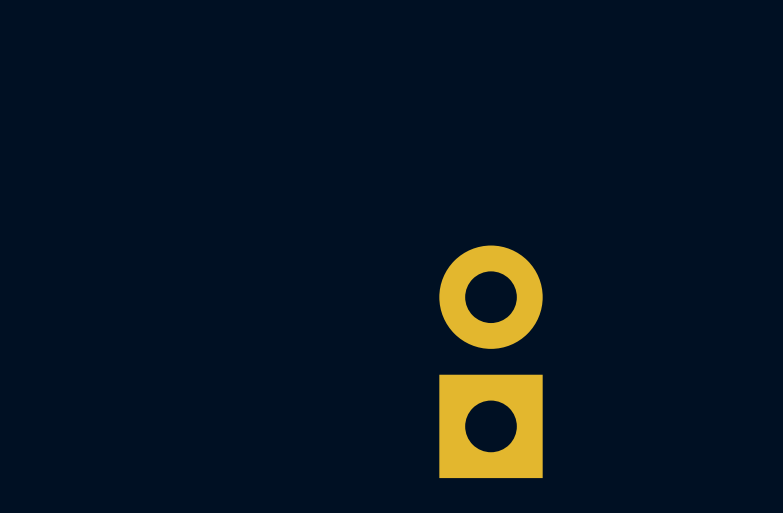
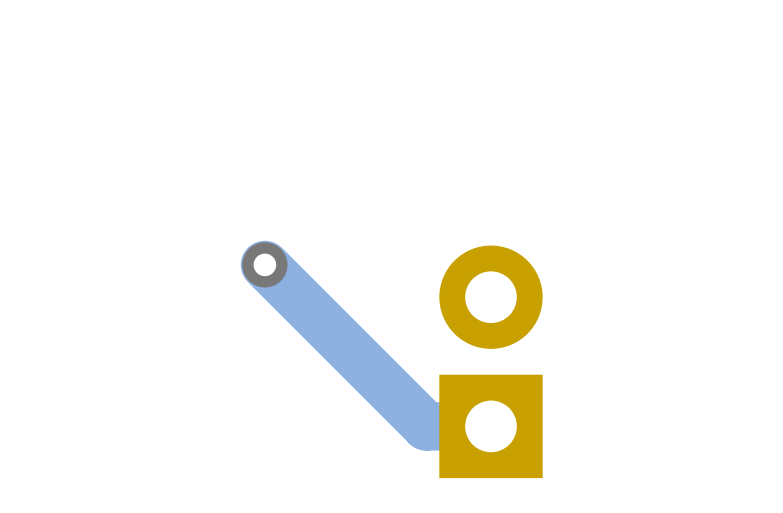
track: none -> (264, 264) (426, 426) (491, 426)
via: none -> (264, 264)

